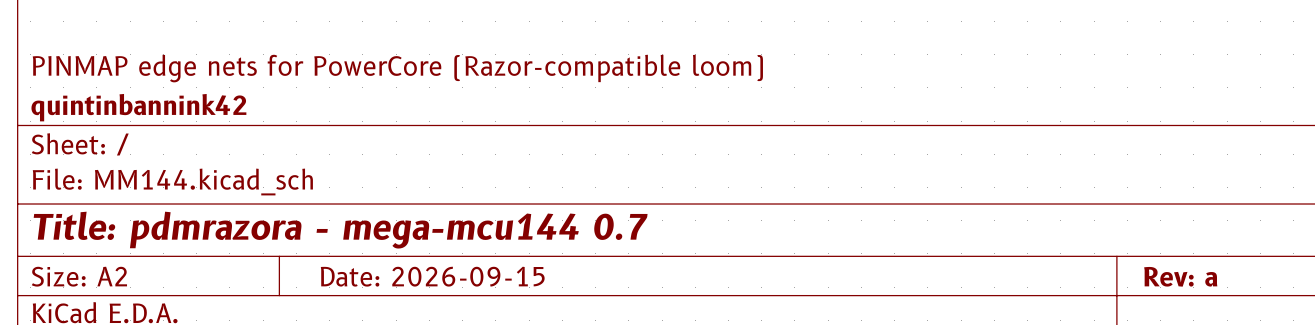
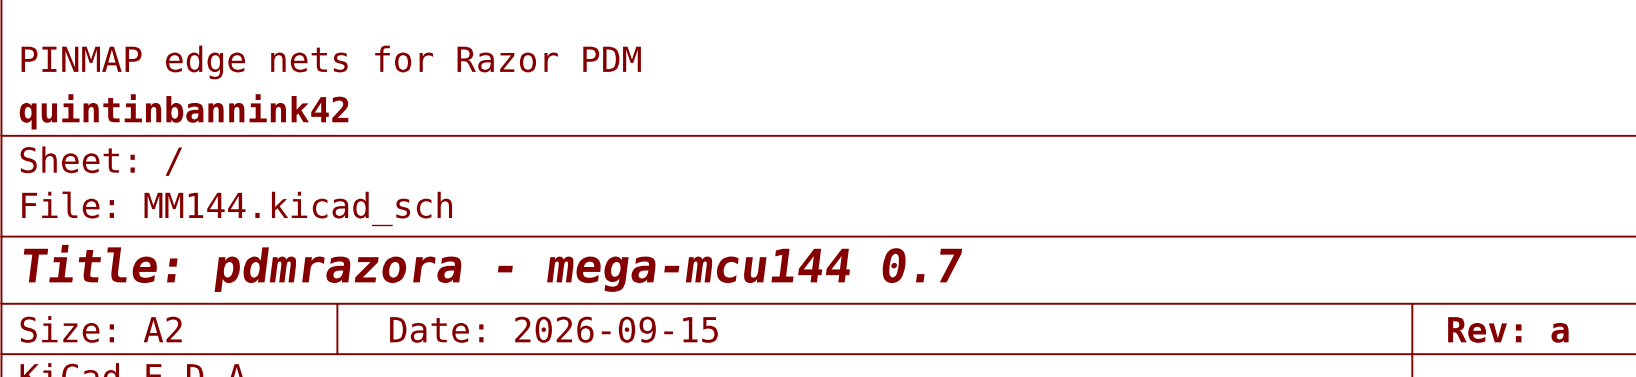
title block: PINMAP edge nets for PowerCore (Razor-compatible loom) (397, 68) -> PINMAP edge nets for Razor PDM (331, 62)

